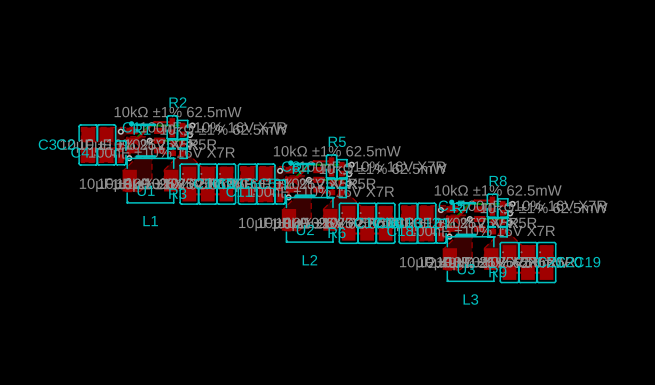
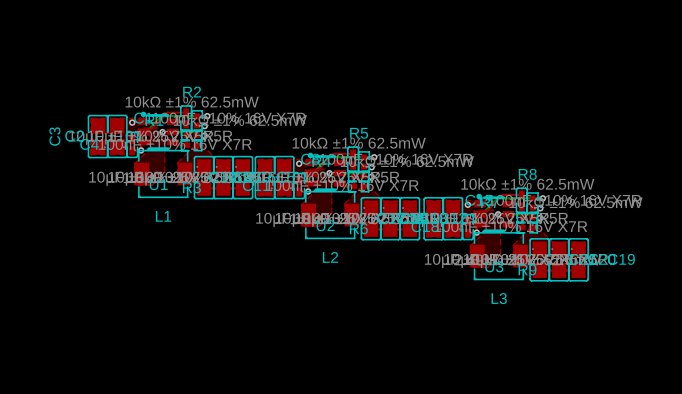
C3 name rotation: 0° (47, 144) -> 90° counterclockwise (54, 136)

